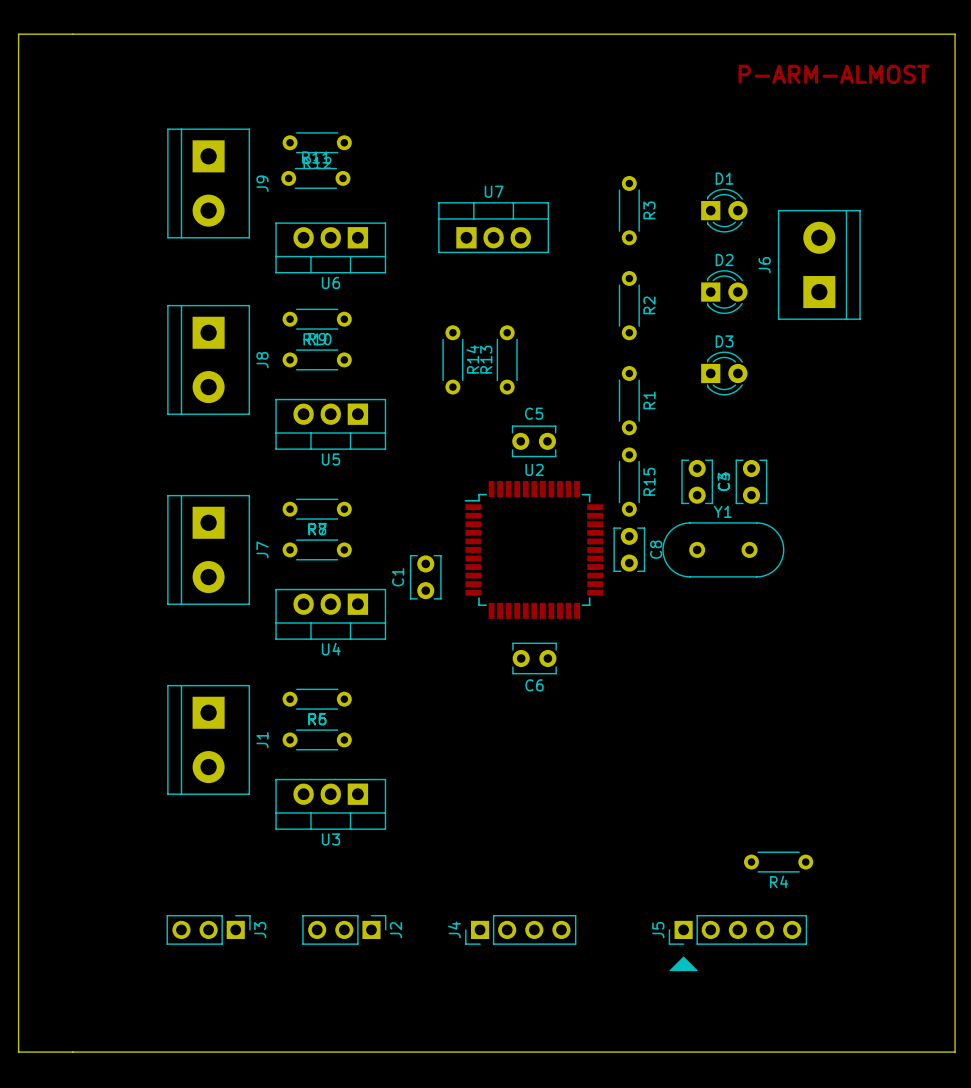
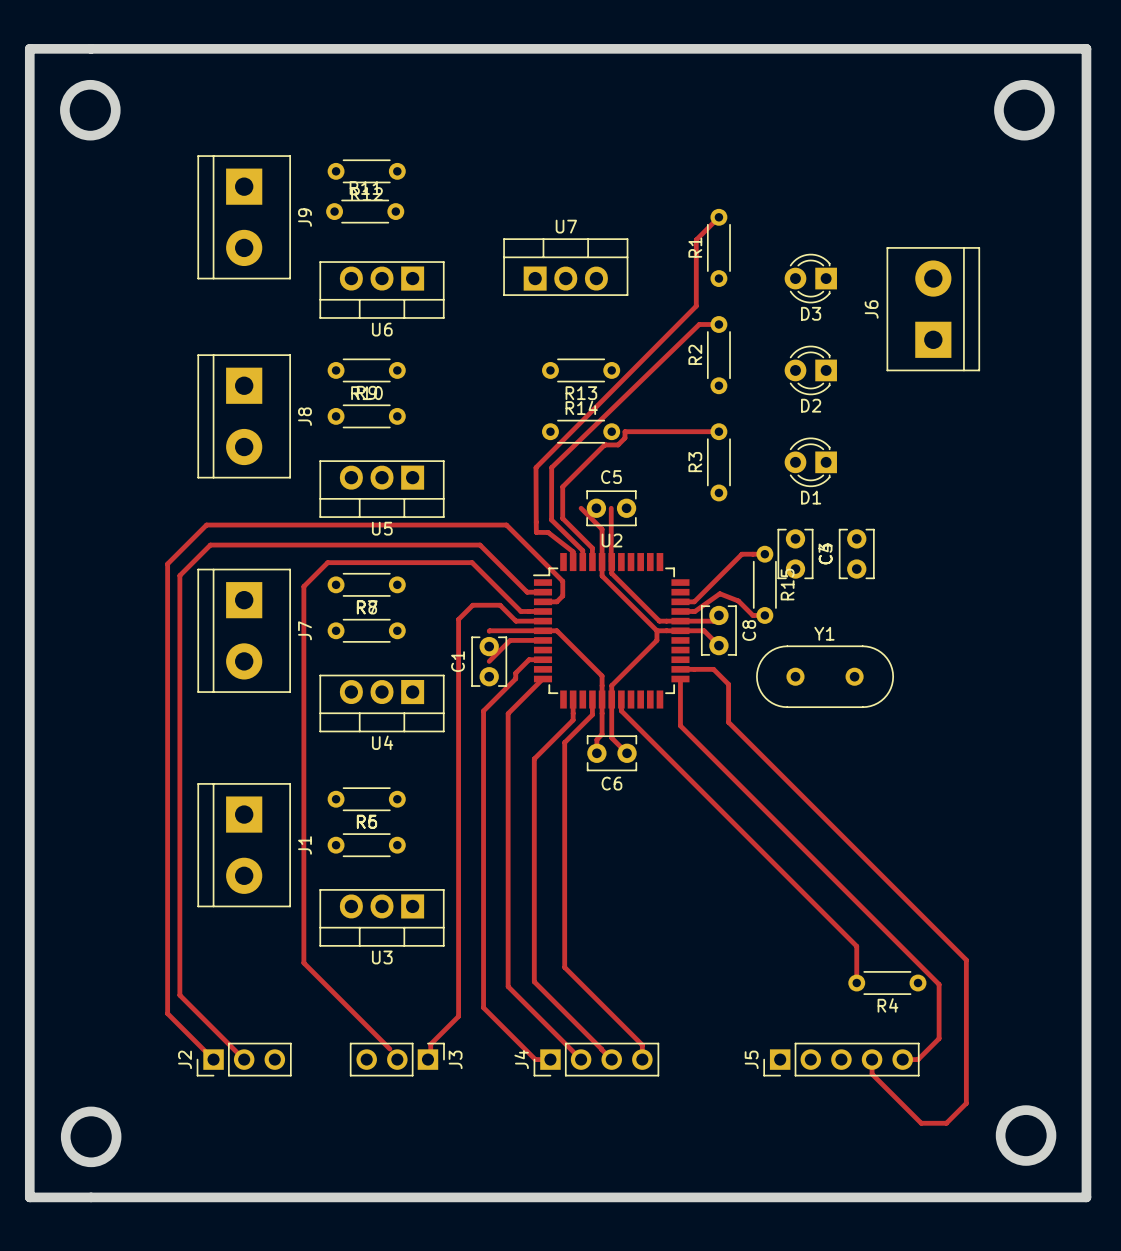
board edge width: thin (18, 34) (955, 34) (955, 1052) (18, 1052) (18, 34) -> thick (29, 48) (1086, 48) (1086, 1197) (29, 1197) (29, 48)
round board edge: none -> [60, 79, 121, 141]
round board edge: none -> [994, 79, 1055, 141]
text: P-ARM-ALMOST (834, 74) -> none
track: none -> (718, 217) (696, 239) (696, 306) (536, 467) (536, 532) (548, 532) (573, 551) (573, 562)
R3 name: R3 (649, 210) -> R1 (695, 247)
D1 rotation: 0° (724, 210) -> 180° (810, 462)
D1 position: (724, 210) -> (810, 462)
track: none -> (718, 324) (699, 324) (551, 467) (551, 519) (582, 550) (582, 562)
D2 rotation: 0° (724, 292) -> 180° (810, 370)
D2 position: (724, 292) -> (810, 370)
R2 name position: R2 (649, 305) -> R2 (695, 354)
R14 rotation: 0° (452, 359) -> 90° clockwise (581, 431)
R14 position: (452, 359) -> (581, 431)
R14 name position: R14 (472, 359) -> R14 (581, 407)
R13 name position: R13 (486, 359) -> R13 (581, 393)
R13 rotation: 0° (507, 359) -> 90° clockwise (581, 370)
track: none -> (718, 431) (624, 431) (624, 438) (618, 444) (604, 444) (562, 486) (562, 518) (592, 548) (592, 562)
D3 rotation: 0° (724, 373) -> 180° (810, 278)
D3 position: (724, 373) -> (810, 278)
R1 name: R1 (649, 400) -> R3 (695, 462)
track: none -> (581, 508) (602, 529) (602, 575) (656, 630)
track: none -> (611, 508) (611, 573) (659, 621) (713, 621) (718, 615)
R15 position: (629, 482) -> (764, 584)
track: none -> (764, 554) (741, 554) (694, 601) (680, 601)
track: none -> (542, 592) (527, 592) (480, 545) (210, 545) (179, 575) (179, 995) (244, 1059)
track: none -> (542, 601) (556, 601) (562, 595) (562, 581) (506, 525) (206, 525) (167, 563) (167, 1013) (213, 1059)
track: none -> (542, 611) (520, 611) (472, 562) (327, 562) (303, 586) (303, 962) (389, 1048)
track: none -> (680, 611) (694, 611) (719, 593) (738, 601) (752, 615) (764, 615)
track: none -> (542, 621) (515, 621) (500, 605) (472, 605) (458, 619) (458, 1016) (430, 1044) (430, 1059)
track: none -> (656, 630) (704, 630) (718, 645)
track: none -> (656, 630) (656, 640) (611, 685) (611, 737) (627, 753)
Y1 position: (723, 549) -> (825, 676)
track: none -> (489, 631) (556, 630) (602, 676) (602, 734) (596, 739) (596, 753)
track: none -> (542, 640) (510, 640) (489, 661)
track: none -> (542, 659) (529, 659) (515, 673) (515, 678) (483, 710) (483, 1007) (535, 1059) (550, 1059)
track: none -> (680, 669) (713, 669) (728, 684) (728, 722) (966, 960) (966, 1103) (946, 1123) (921, 1123) (872, 1074) (872, 1059)
track: none -> (542, 679) (508, 713) (508, 986) (581, 1059)
track: none -> (680, 679) (680, 725) (939, 984) (939, 1038) (918, 1059) (902, 1059)
track: none -> (573, 699) (573, 720) (534, 758) (534, 981) (611, 1059)
track: none -> (592, 699) (592, 714) (564, 742) (564, 967) (642, 1045) (642, 1059)
track: none -> (621, 699) (621, 710) (856, 946) (856, 983)
J3: (208, 929) -> none
J2: none -> (244, 1059)
J2 name: J2 (395, 930) -> J3 (455, 1059)
drawing: [669, 956, 698, 972] -> none
round board edge: none -> [995, 1105, 1057, 1166]
round board edge: none -> [60, 1106, 122, 1168]

